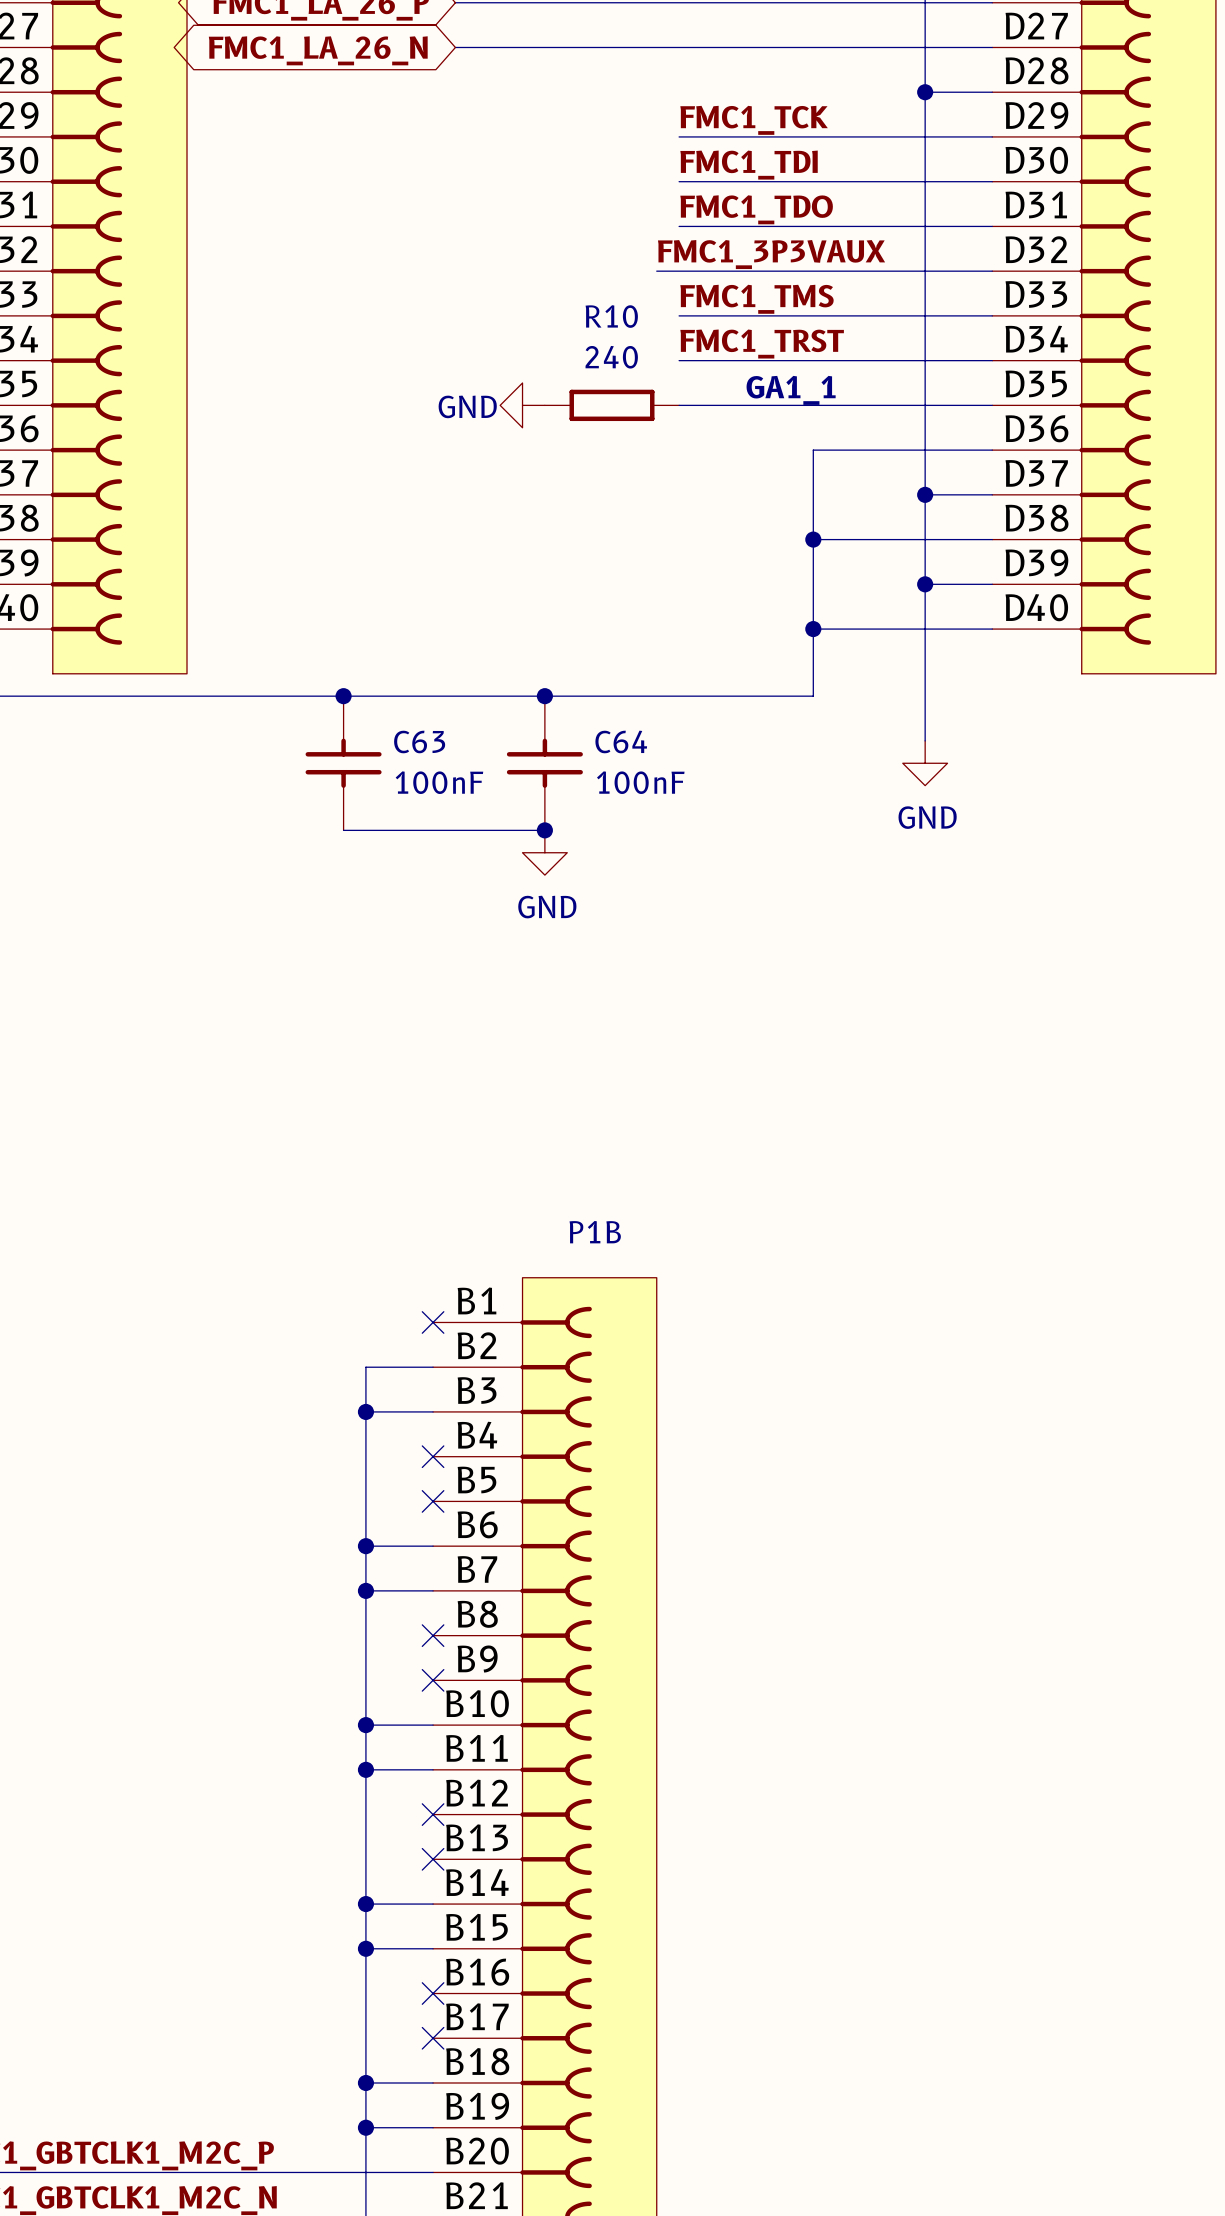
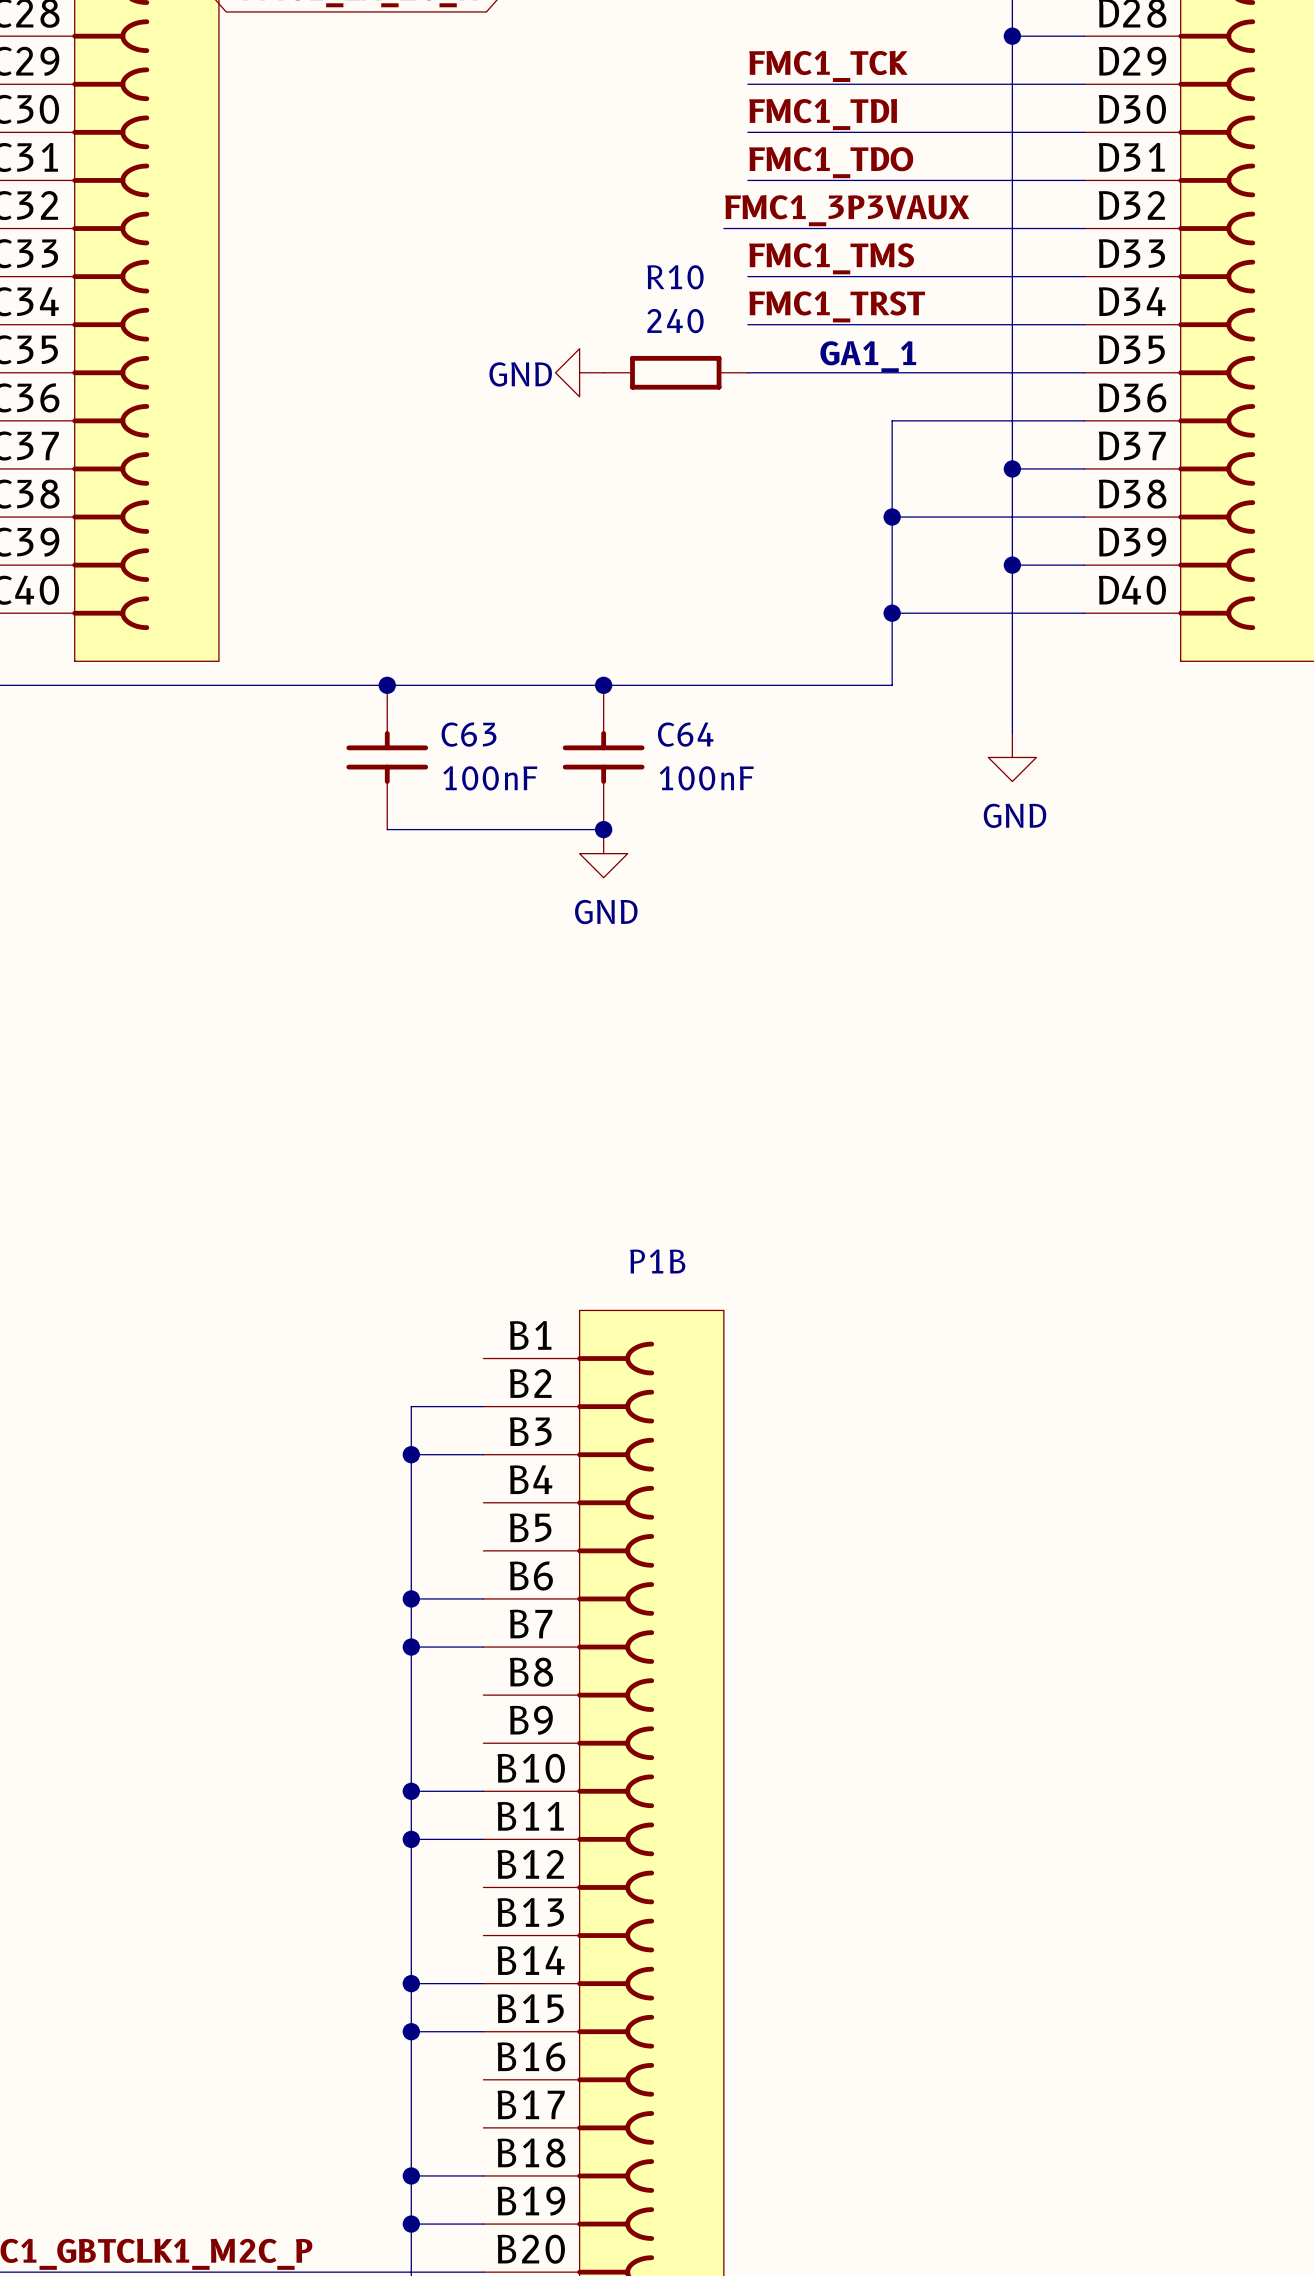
no-connect mark: (433, 1322) -> none
no-connect mark: (433, 1456) -> none
no-connect mark: (433, 1501) -> none
no-connect mark: (433, 1635) -> none
no-connect mark: (433, 1680) -> none
no-connect mark: (433, 1814) -> none
no-connect mark: (433, 1859) -> none
no-connect mark: (433, 1993) -> none
no-connect mark: (433, 2038) -> none

